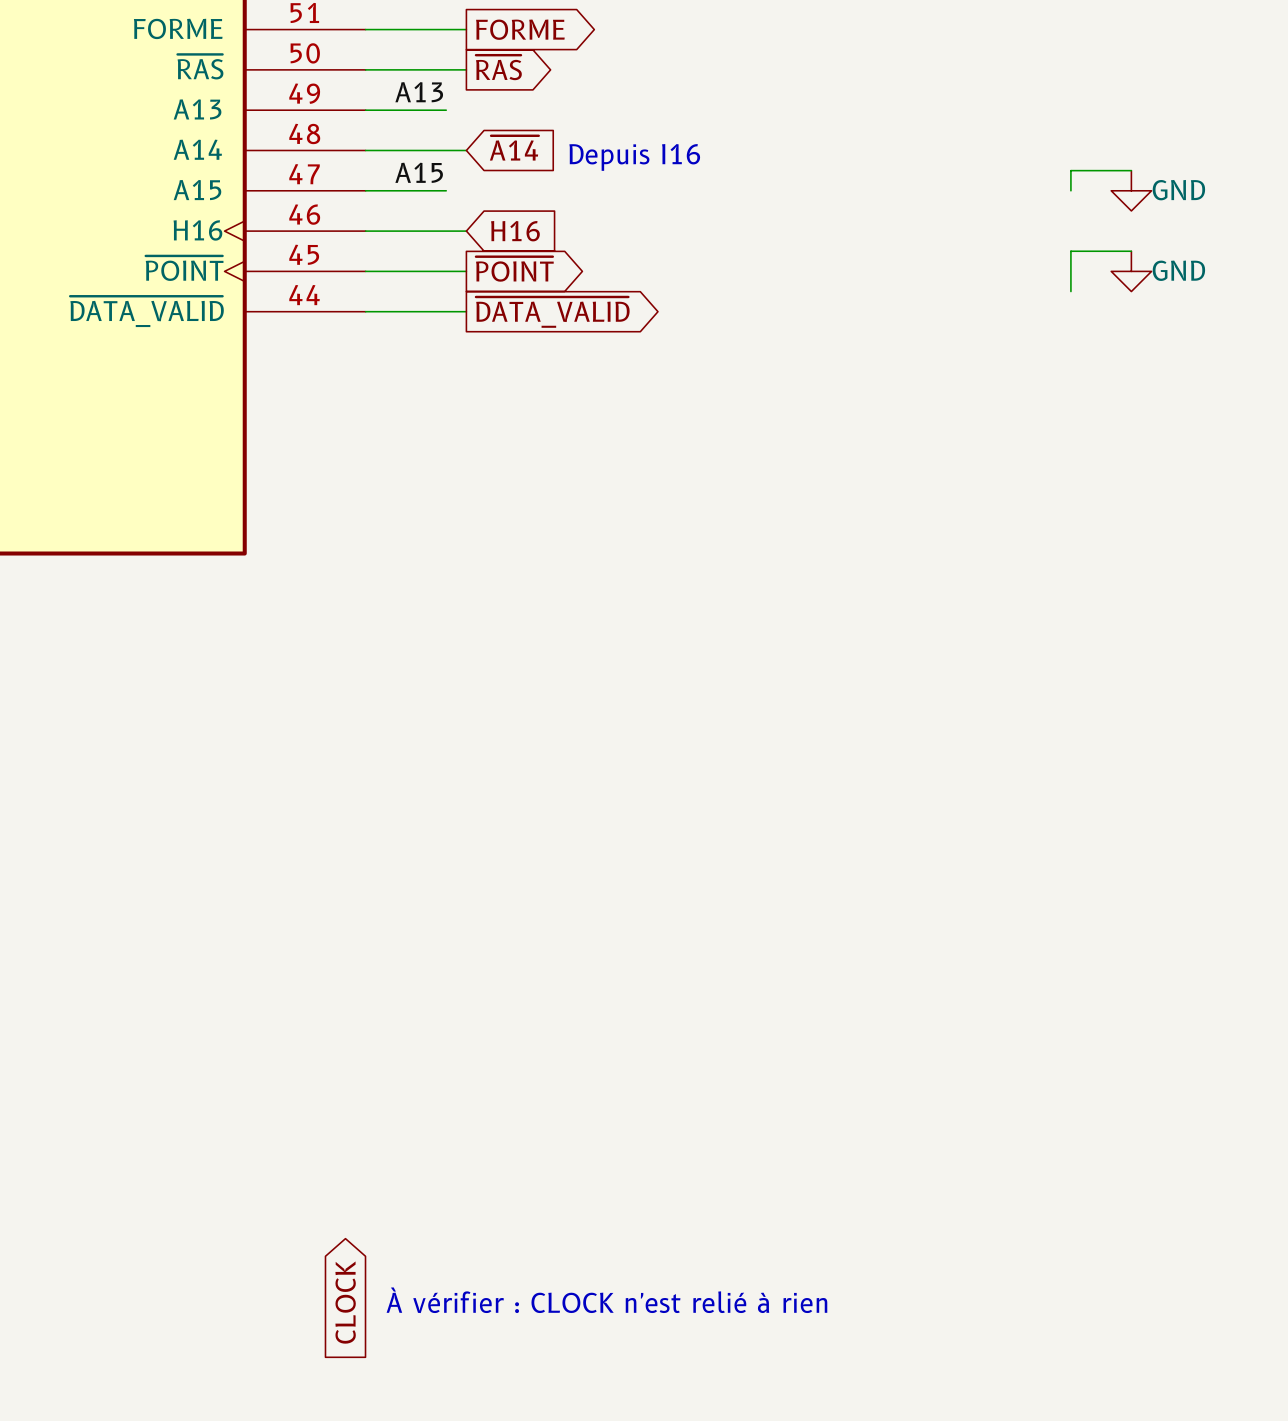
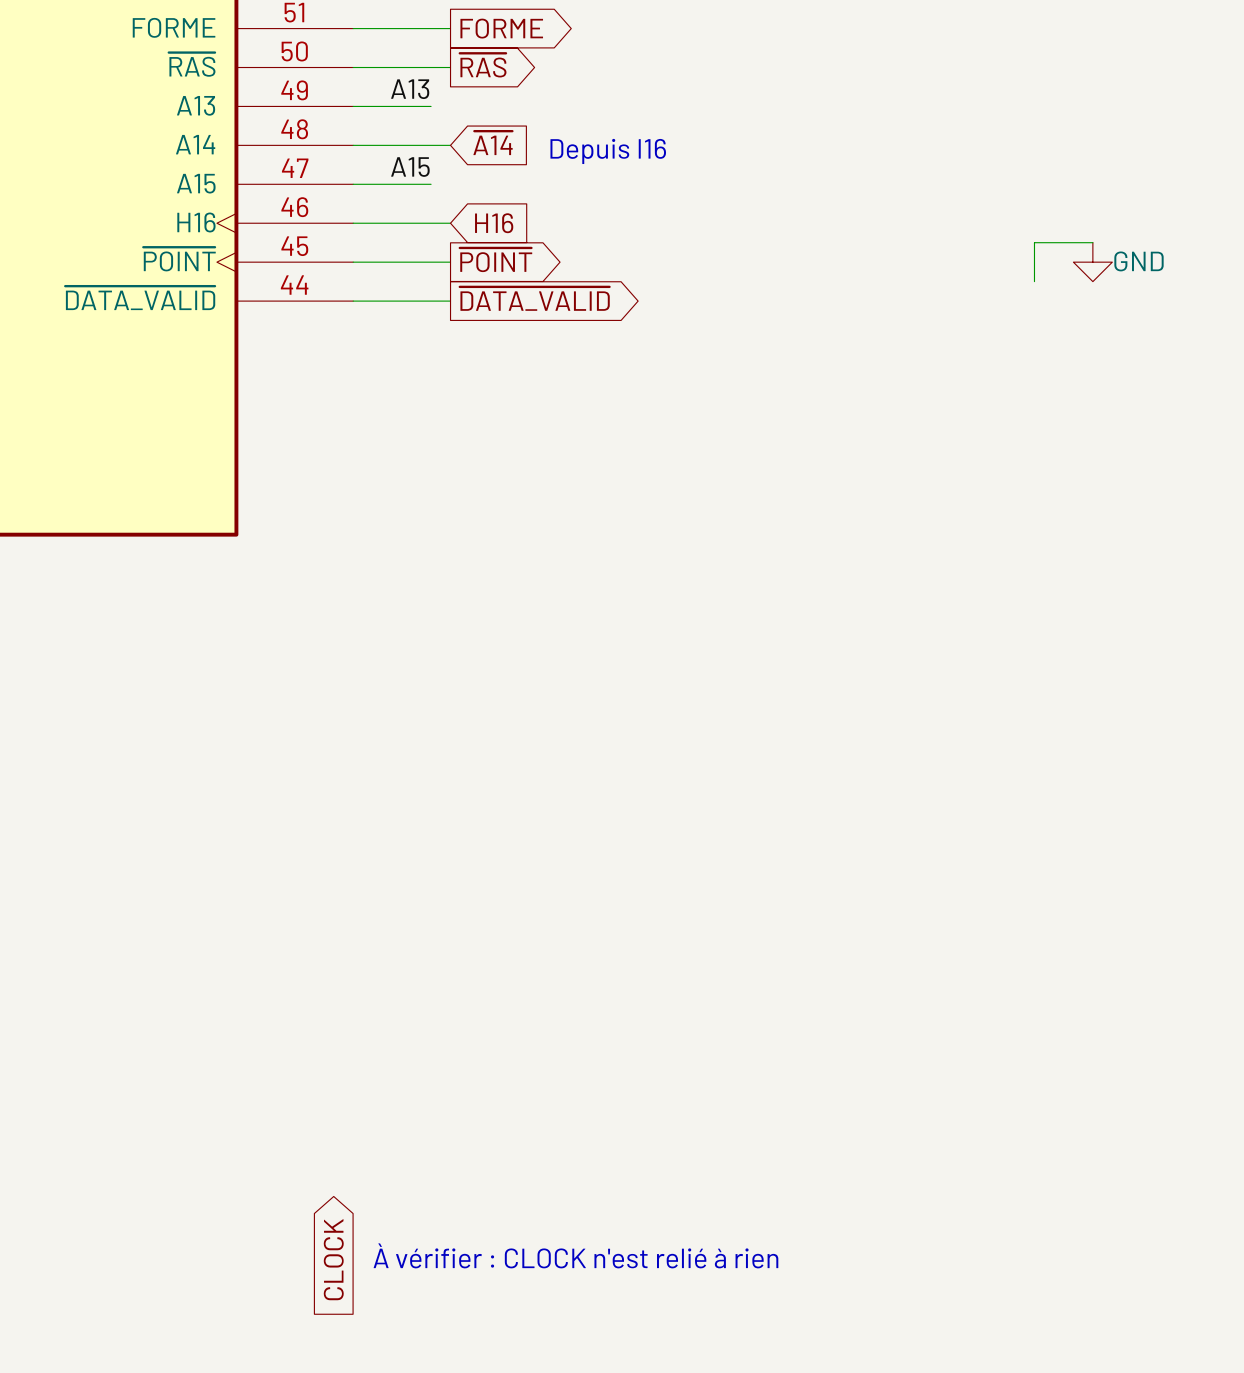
wire: (1131, 170) (1070, 170) (1070, 190) -> none
power symbol: GND (1131, 190) -> none

